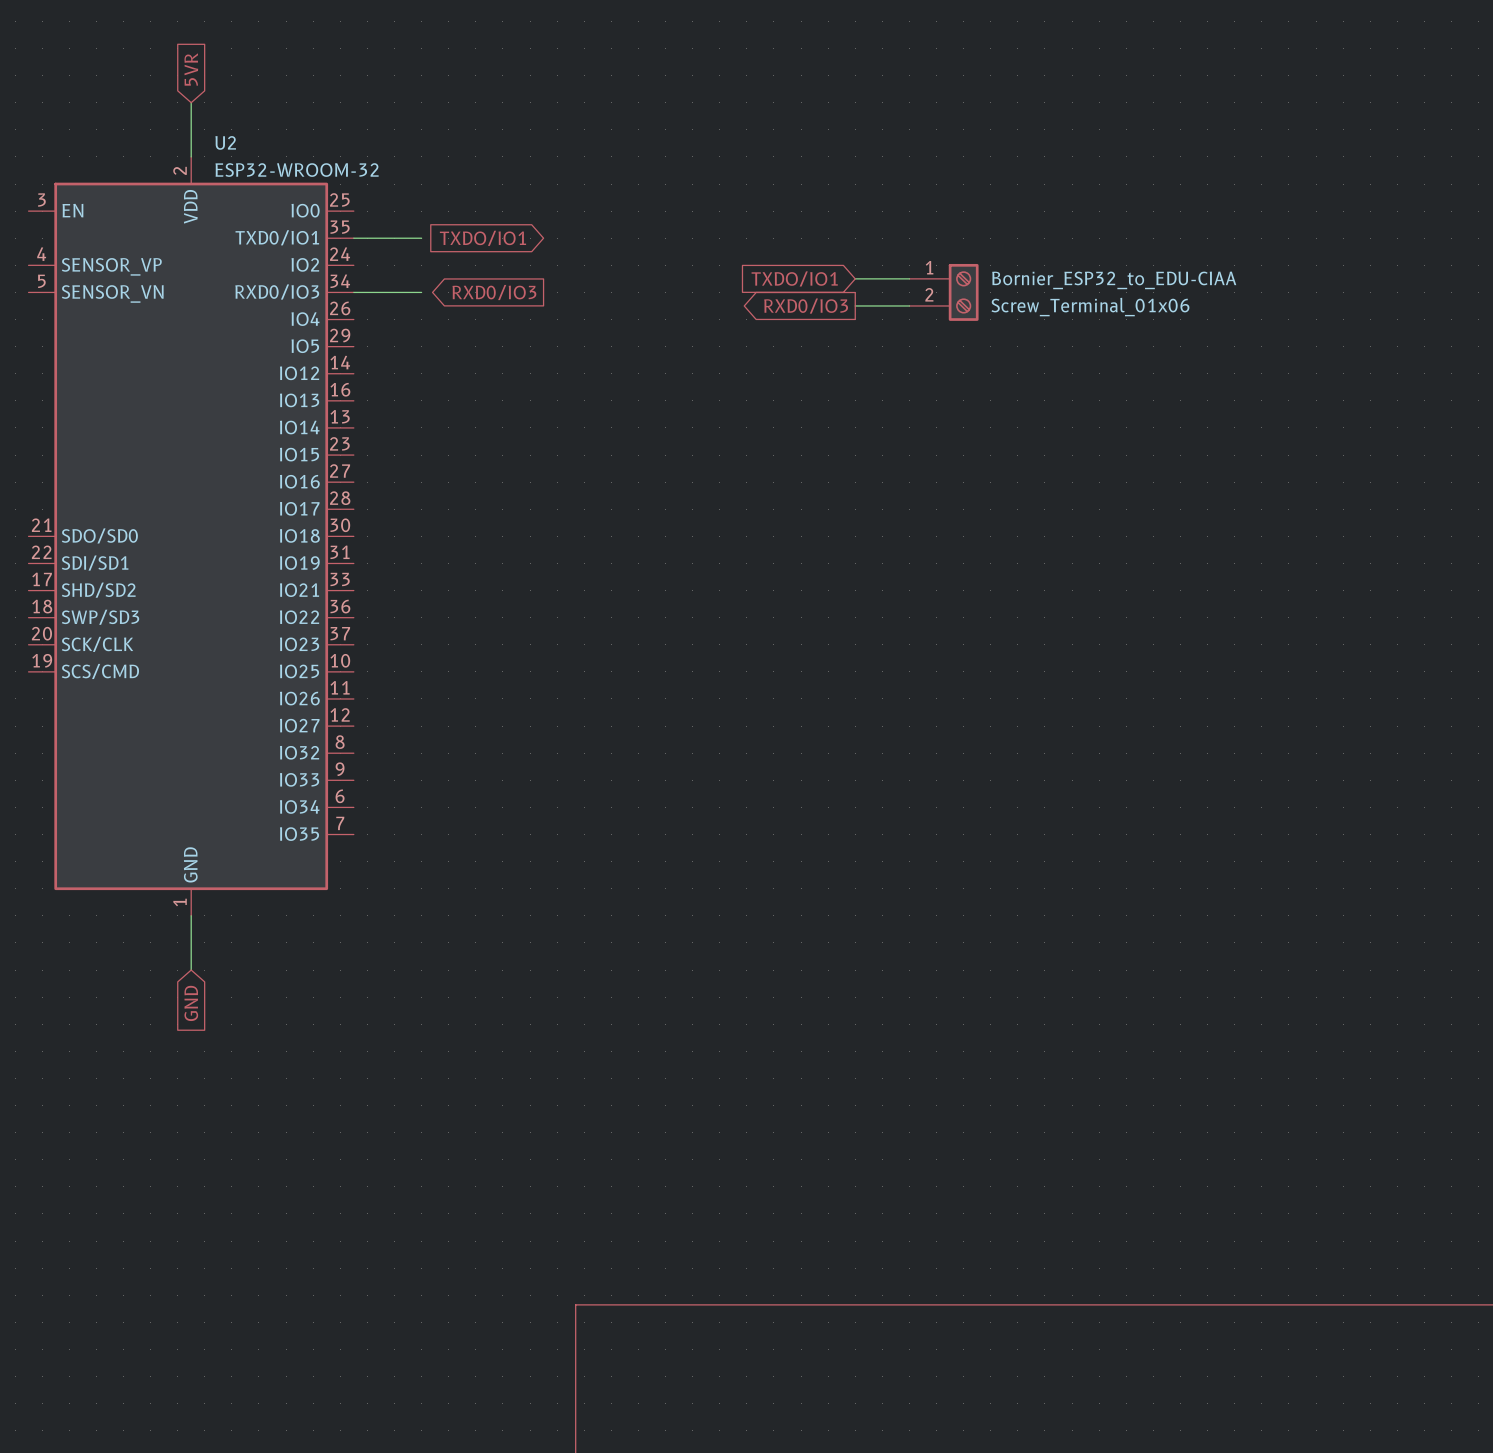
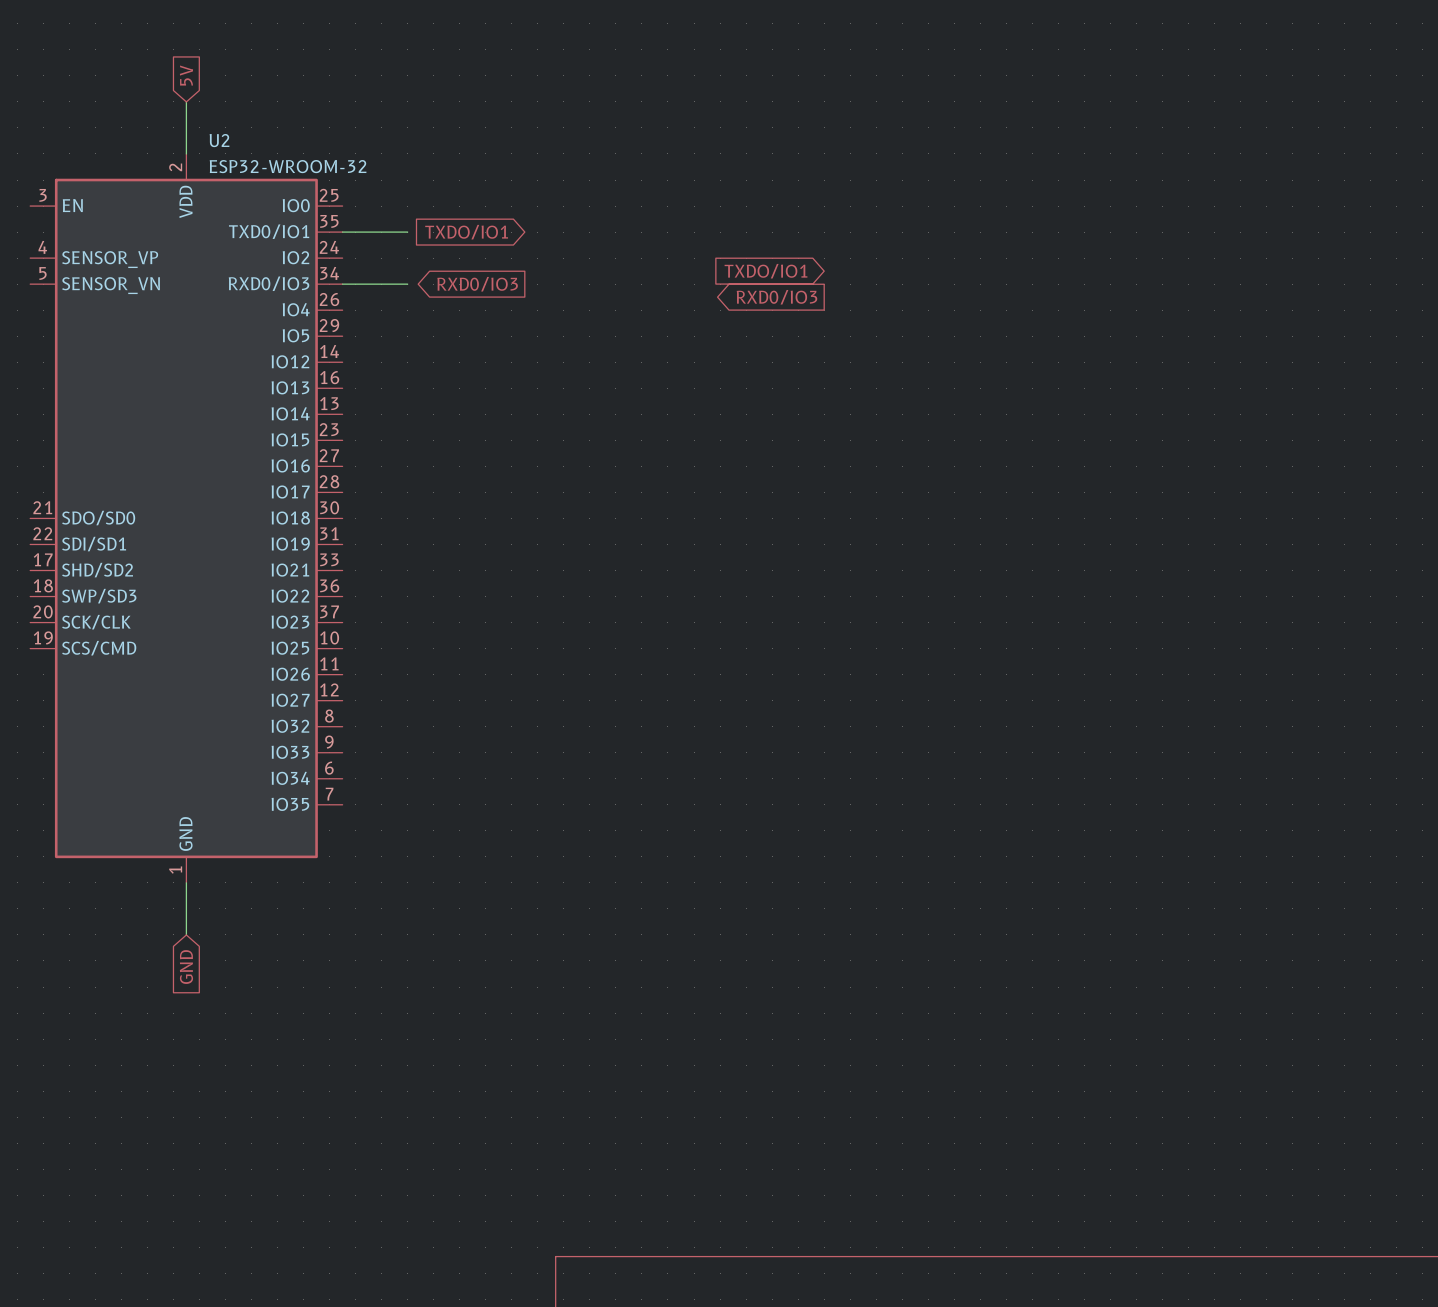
global label: 5VR (191, 69) -> 5V (186, 75)
wire: (855, 278) (909, 278) -> none
Bornier_ESP32_to_EDU-CIAA: Screw_Terminal_01x06 (944, 292) -> none
wire: (855, 305) (909, 305) -> none

